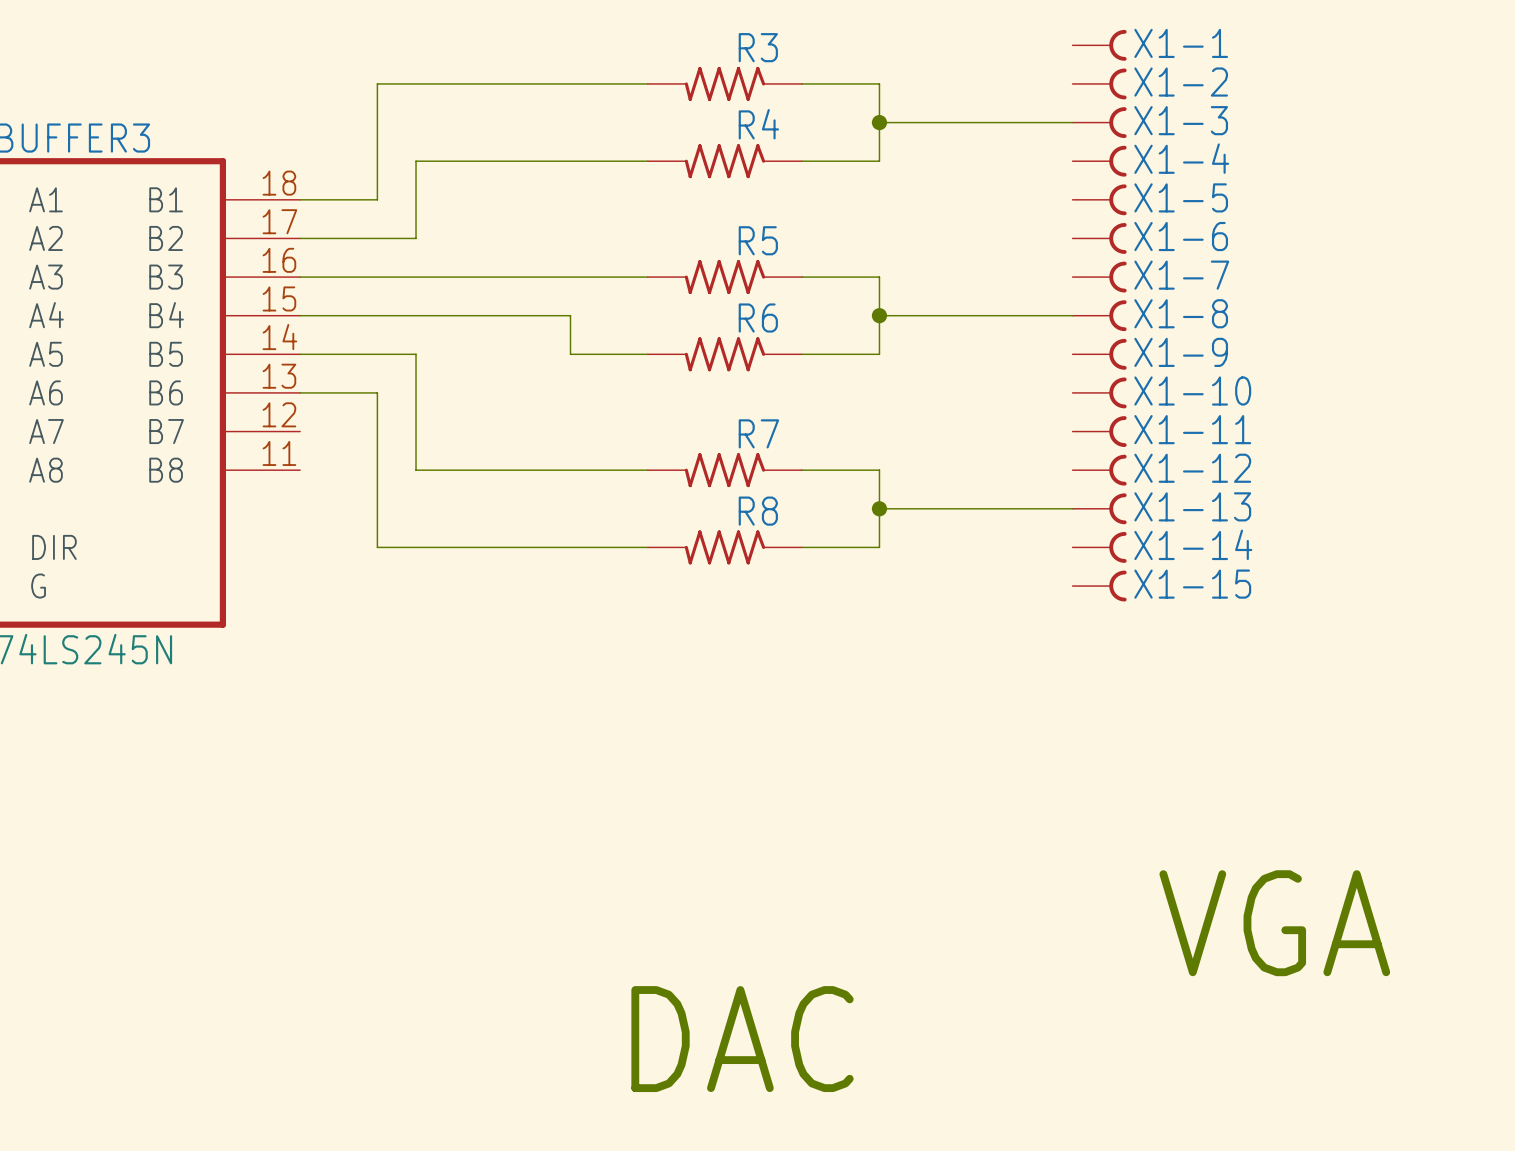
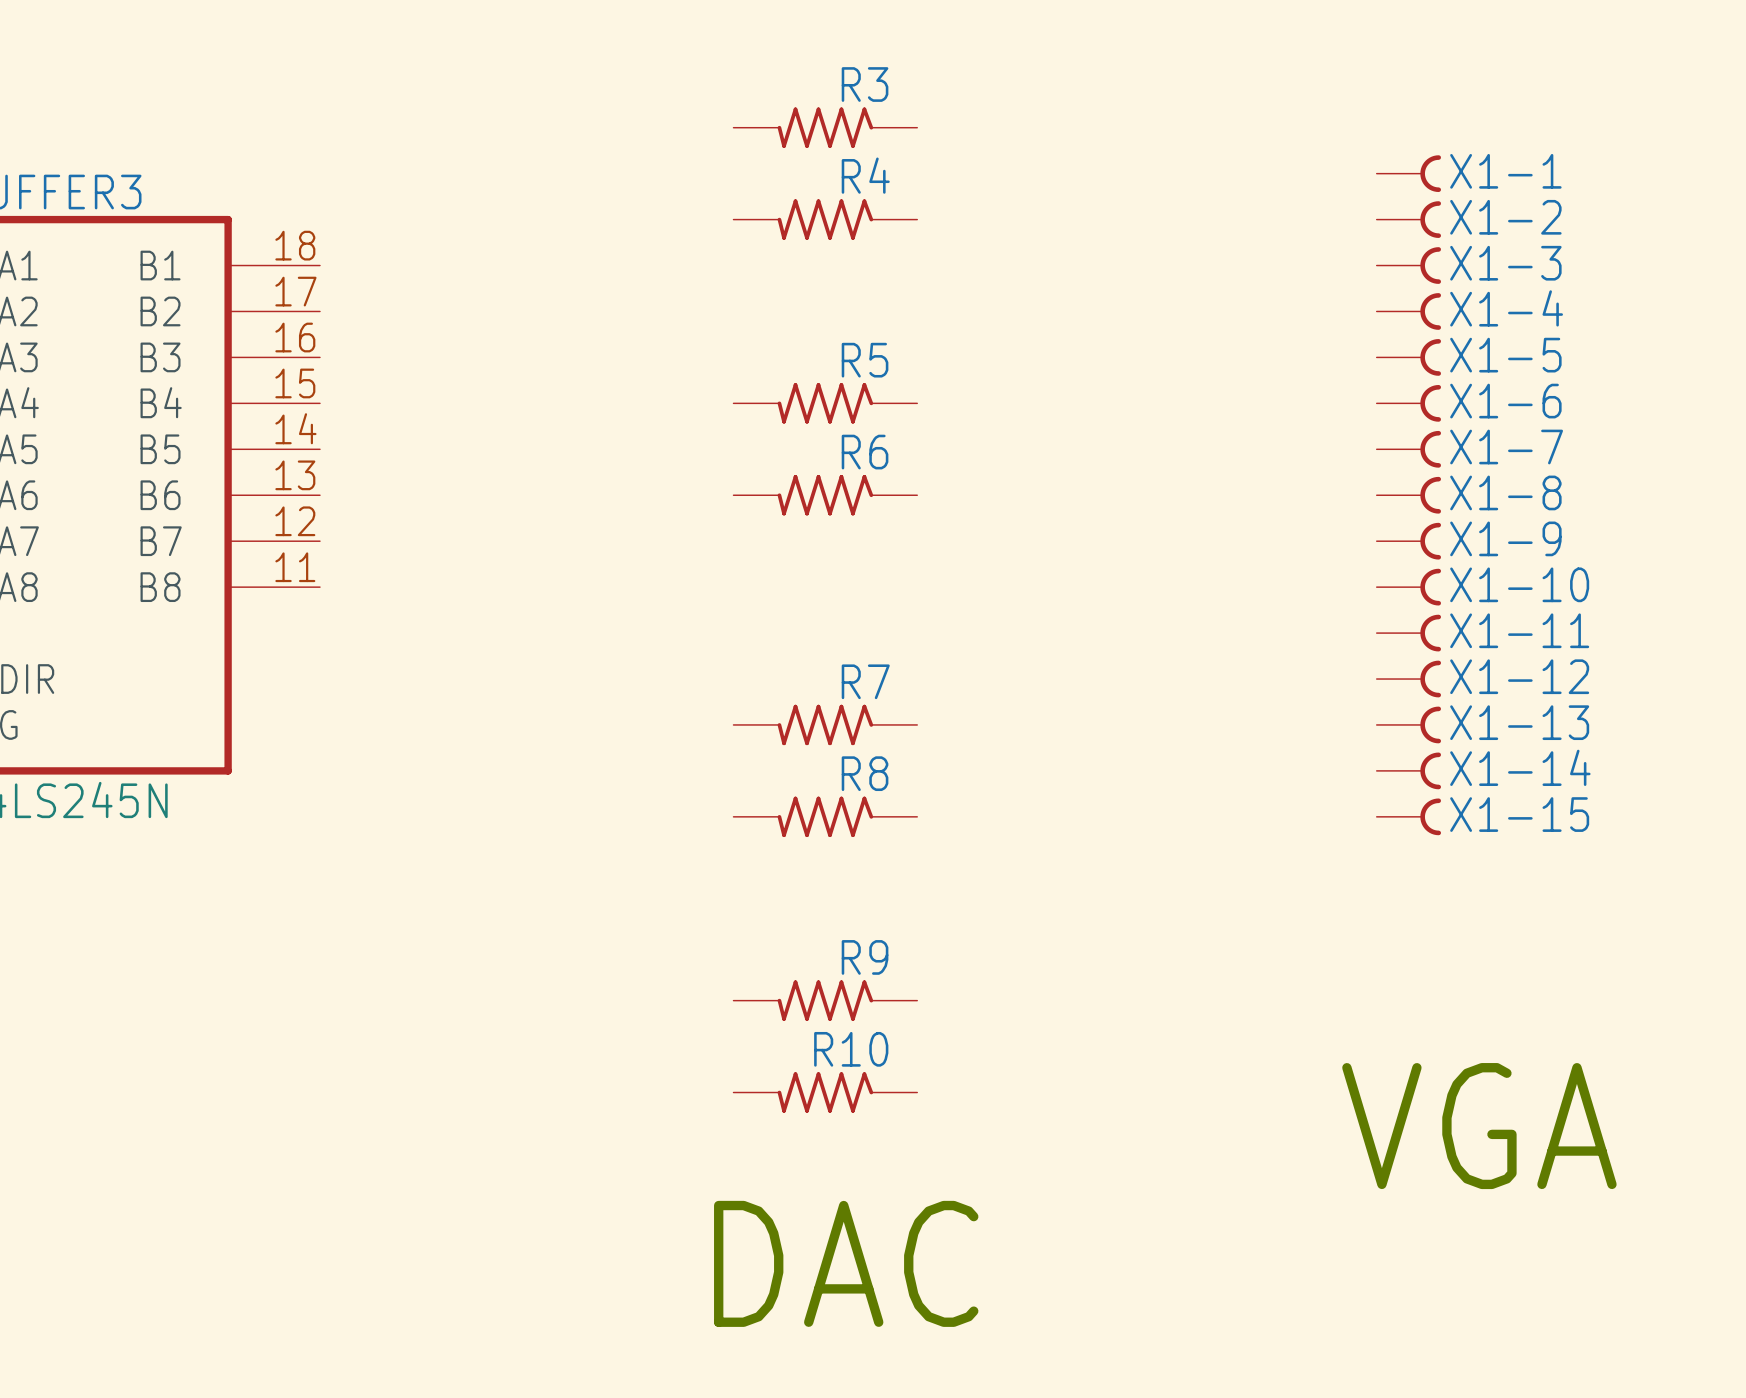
X1-1 position: (1099, 45) -> (1408, 173)
wire: (647, 83) (377, 83) (377, 199) (300, 199) -> none
wire: (802, 83) (879, 83) (879, 161) (802, 161) -> none
X1-2 position: (1099, 83) -> (1408, 219)
wire: (879, 122) (1072, 122) -> none
junction: (879, 122) -> none
X1-3 position: (1099, 122) -> (1408, 265)
wire: (647, 161) (416, 161) (416, 238) (300, 238) -> none
X1-4 position: (1099, 161) -> (1408, 311)
X1-5 position: (1099, 199) -> (1408, 357)
X1-6 position: (1099, 238) -> (1408, 403)
wire: (300, 277) (647, 277) -> none
R5 position: (724, 277) -> (825, 403)
wire: (802, 277) (879, 277) (879, 354) (802, 354) -> none
X1-7 position: (1099, 277) -> (1408, 449)
wire: (300, 315) (570, 315) (570, 354) (647, 354) -> none
wire: (879, 315) (1072, 315) -> none
junction: (879, 315) -> none
X1-8 position: (1099, 315) -> (1408, 495)
wire: (300, 354) (416, 354) (416, 470) (647, 470) -> none
R6 position: (724, 354) -> (825, 495)
X1-9 position: (1099, 354) -> (1408, 541)
wire: (300, 392) (377, 392) (377, 547) (647, 547) -> none
X1-10 position: (1099, 392) -> (1408, 587)
X1-11 position: (1099, 431) -> (1408, 633)
R7 position: (724, 470) -> (825, 724)
wire: (802, 470) (879, 470) (879, 547) (802, 547) -> none
X1-12 position: (1099, 470) -> (1408, 679)
wire: (879, 508) (1072, 508) -> none
junction: (879, 508) -> none
X1-13 position: (1099, 508) -> (1408, 724)
R8 position: (724, 547) -> (825, 816)
X1-14 position: (1099, 547) -> (1408, 770)
X1-15 position: (1099, 586) -> (1408, 816)
R9: none -> (825, 1000)
R10: none -> (825, 1092)

